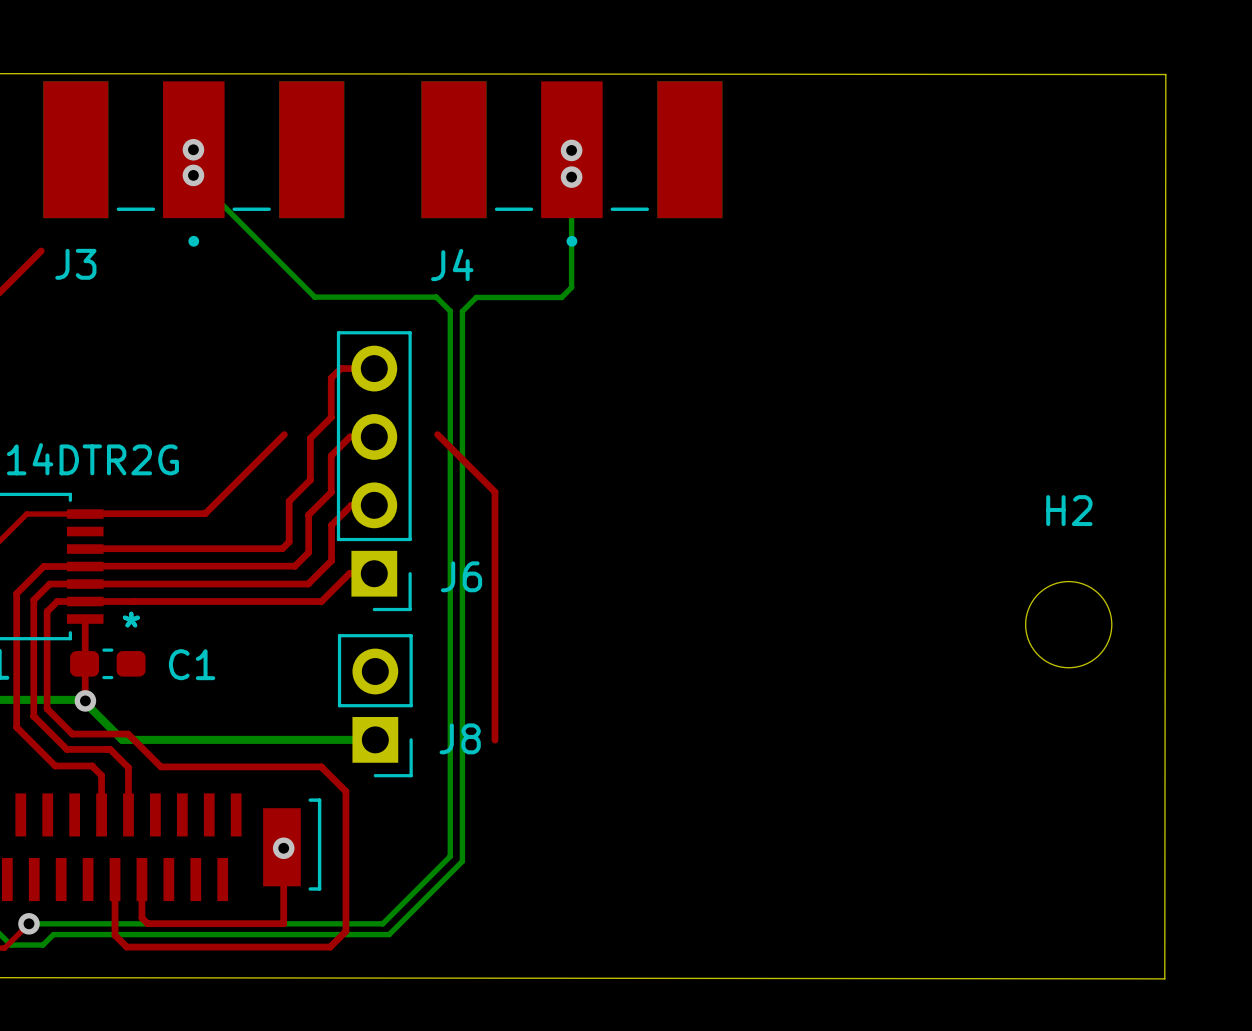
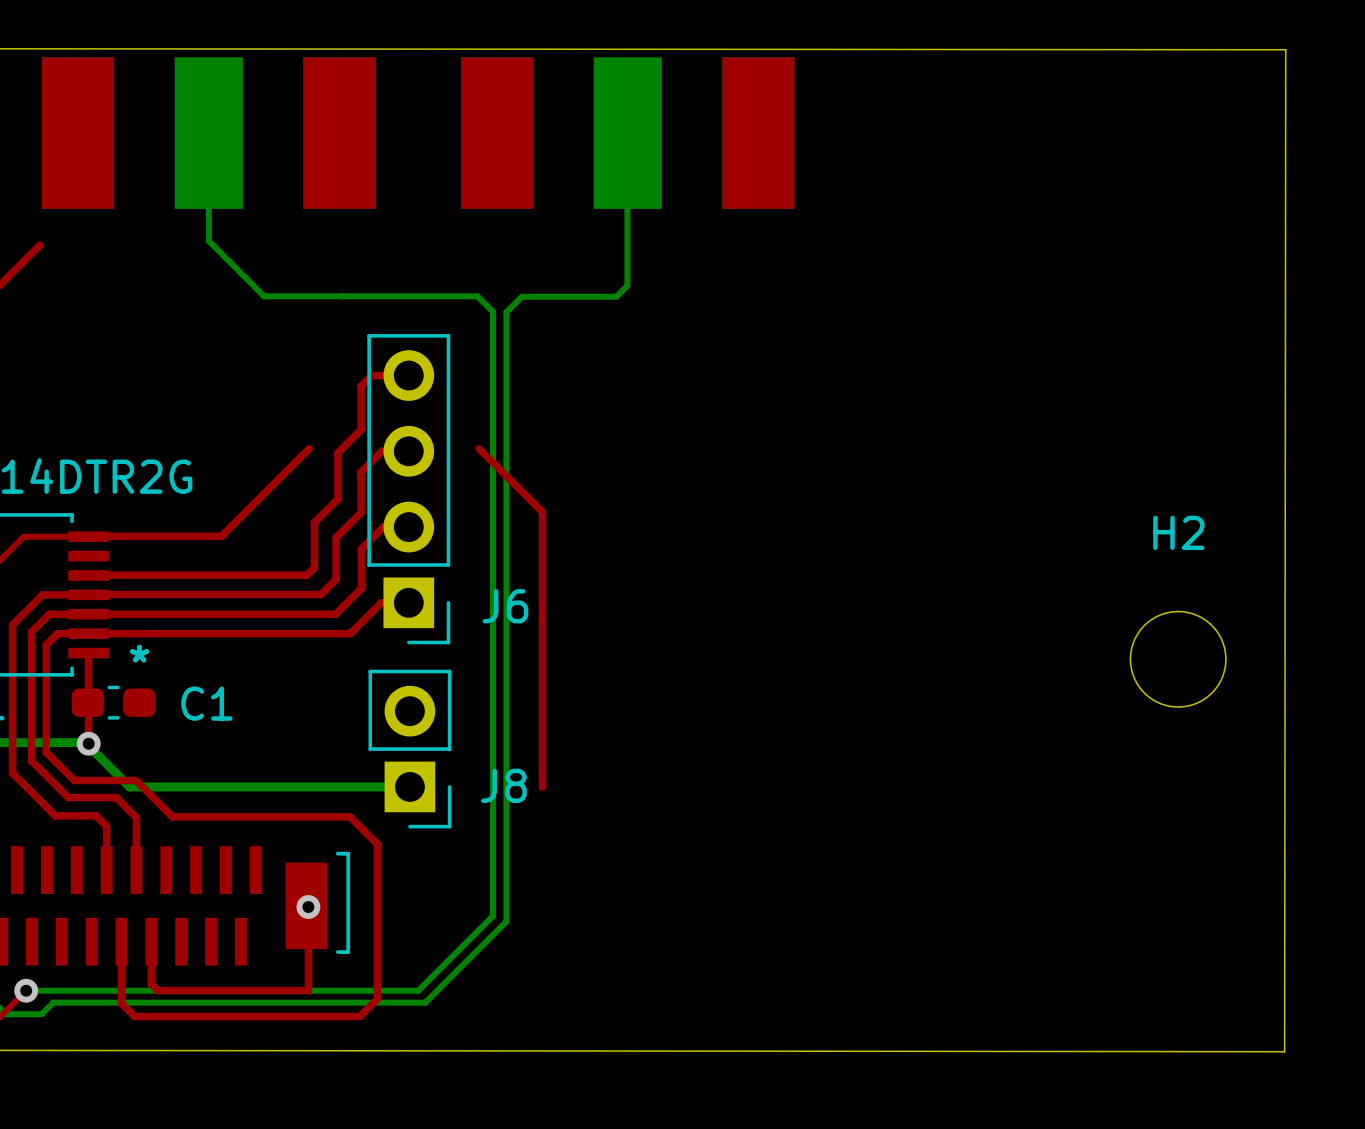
via: (193, 149) -> none
via: (571, 150) -> none
J3 side: top (193, 164) -> bottom (208, 133)
J4 side: top (571, 164) -> bottom (627, 133)
bottom track: (193, 175) (314, 297) -> (208, 133) (208, 241) (264, 296) (342, 296)
via: (193, 175) -> none
via: (571, 177) -> none

